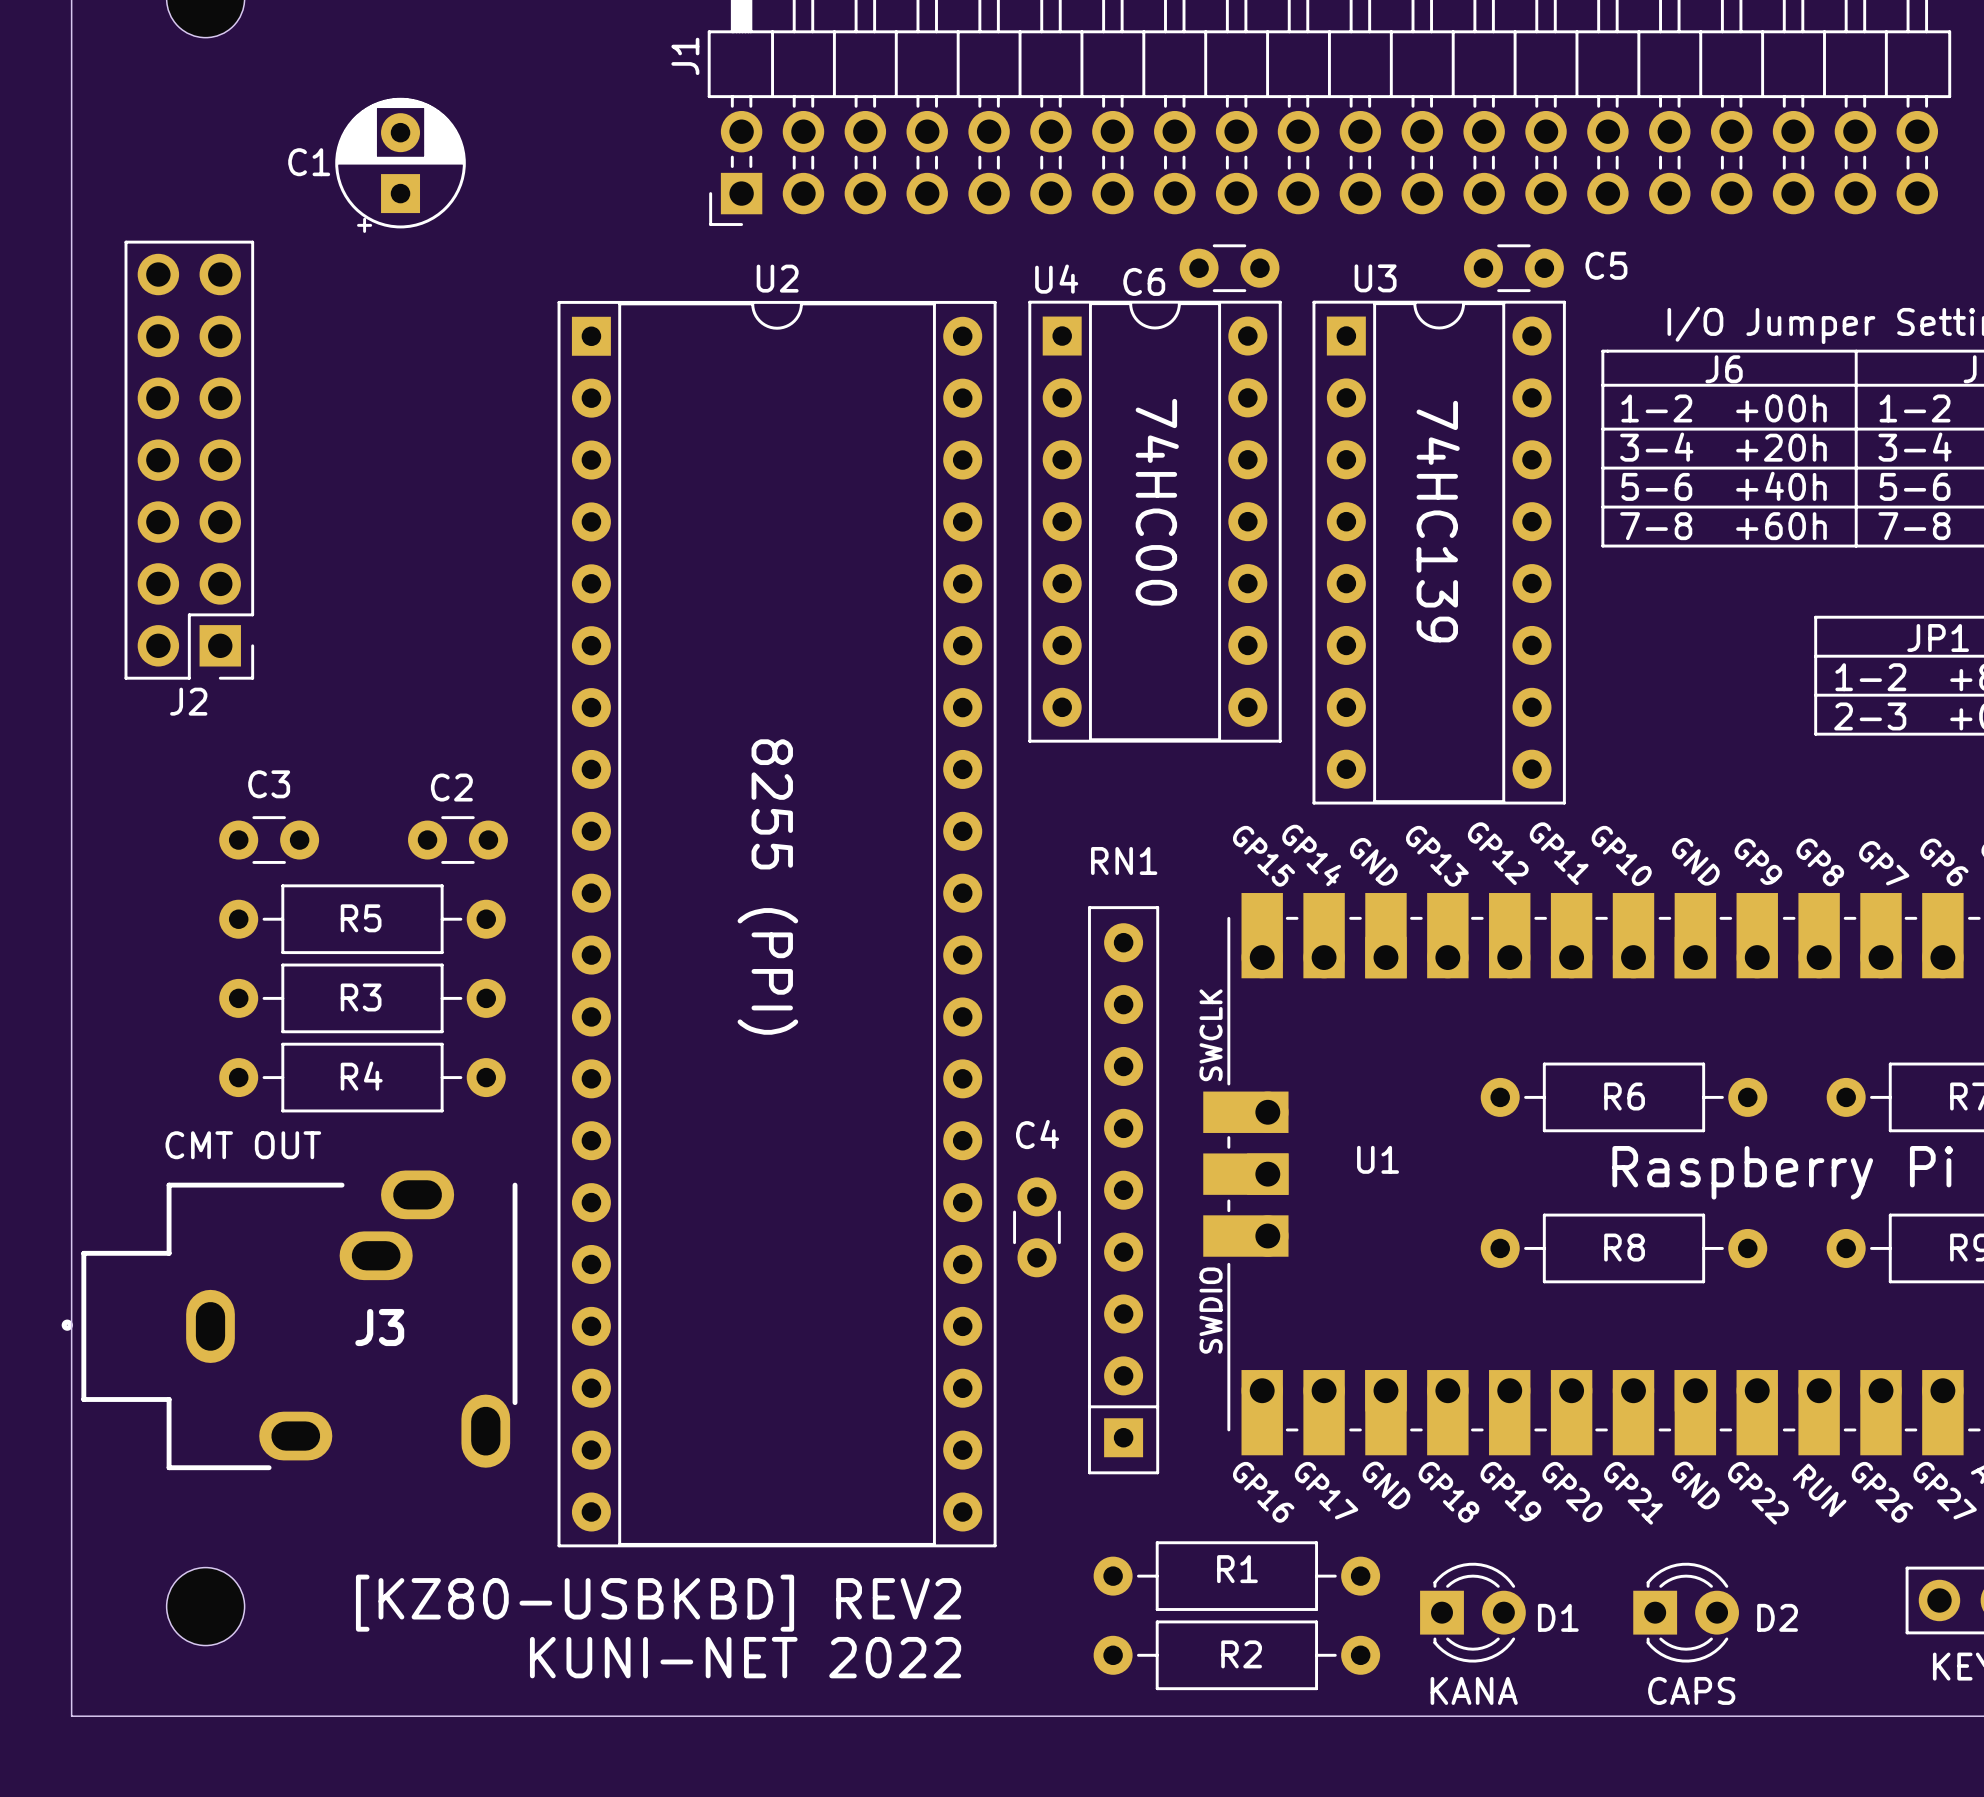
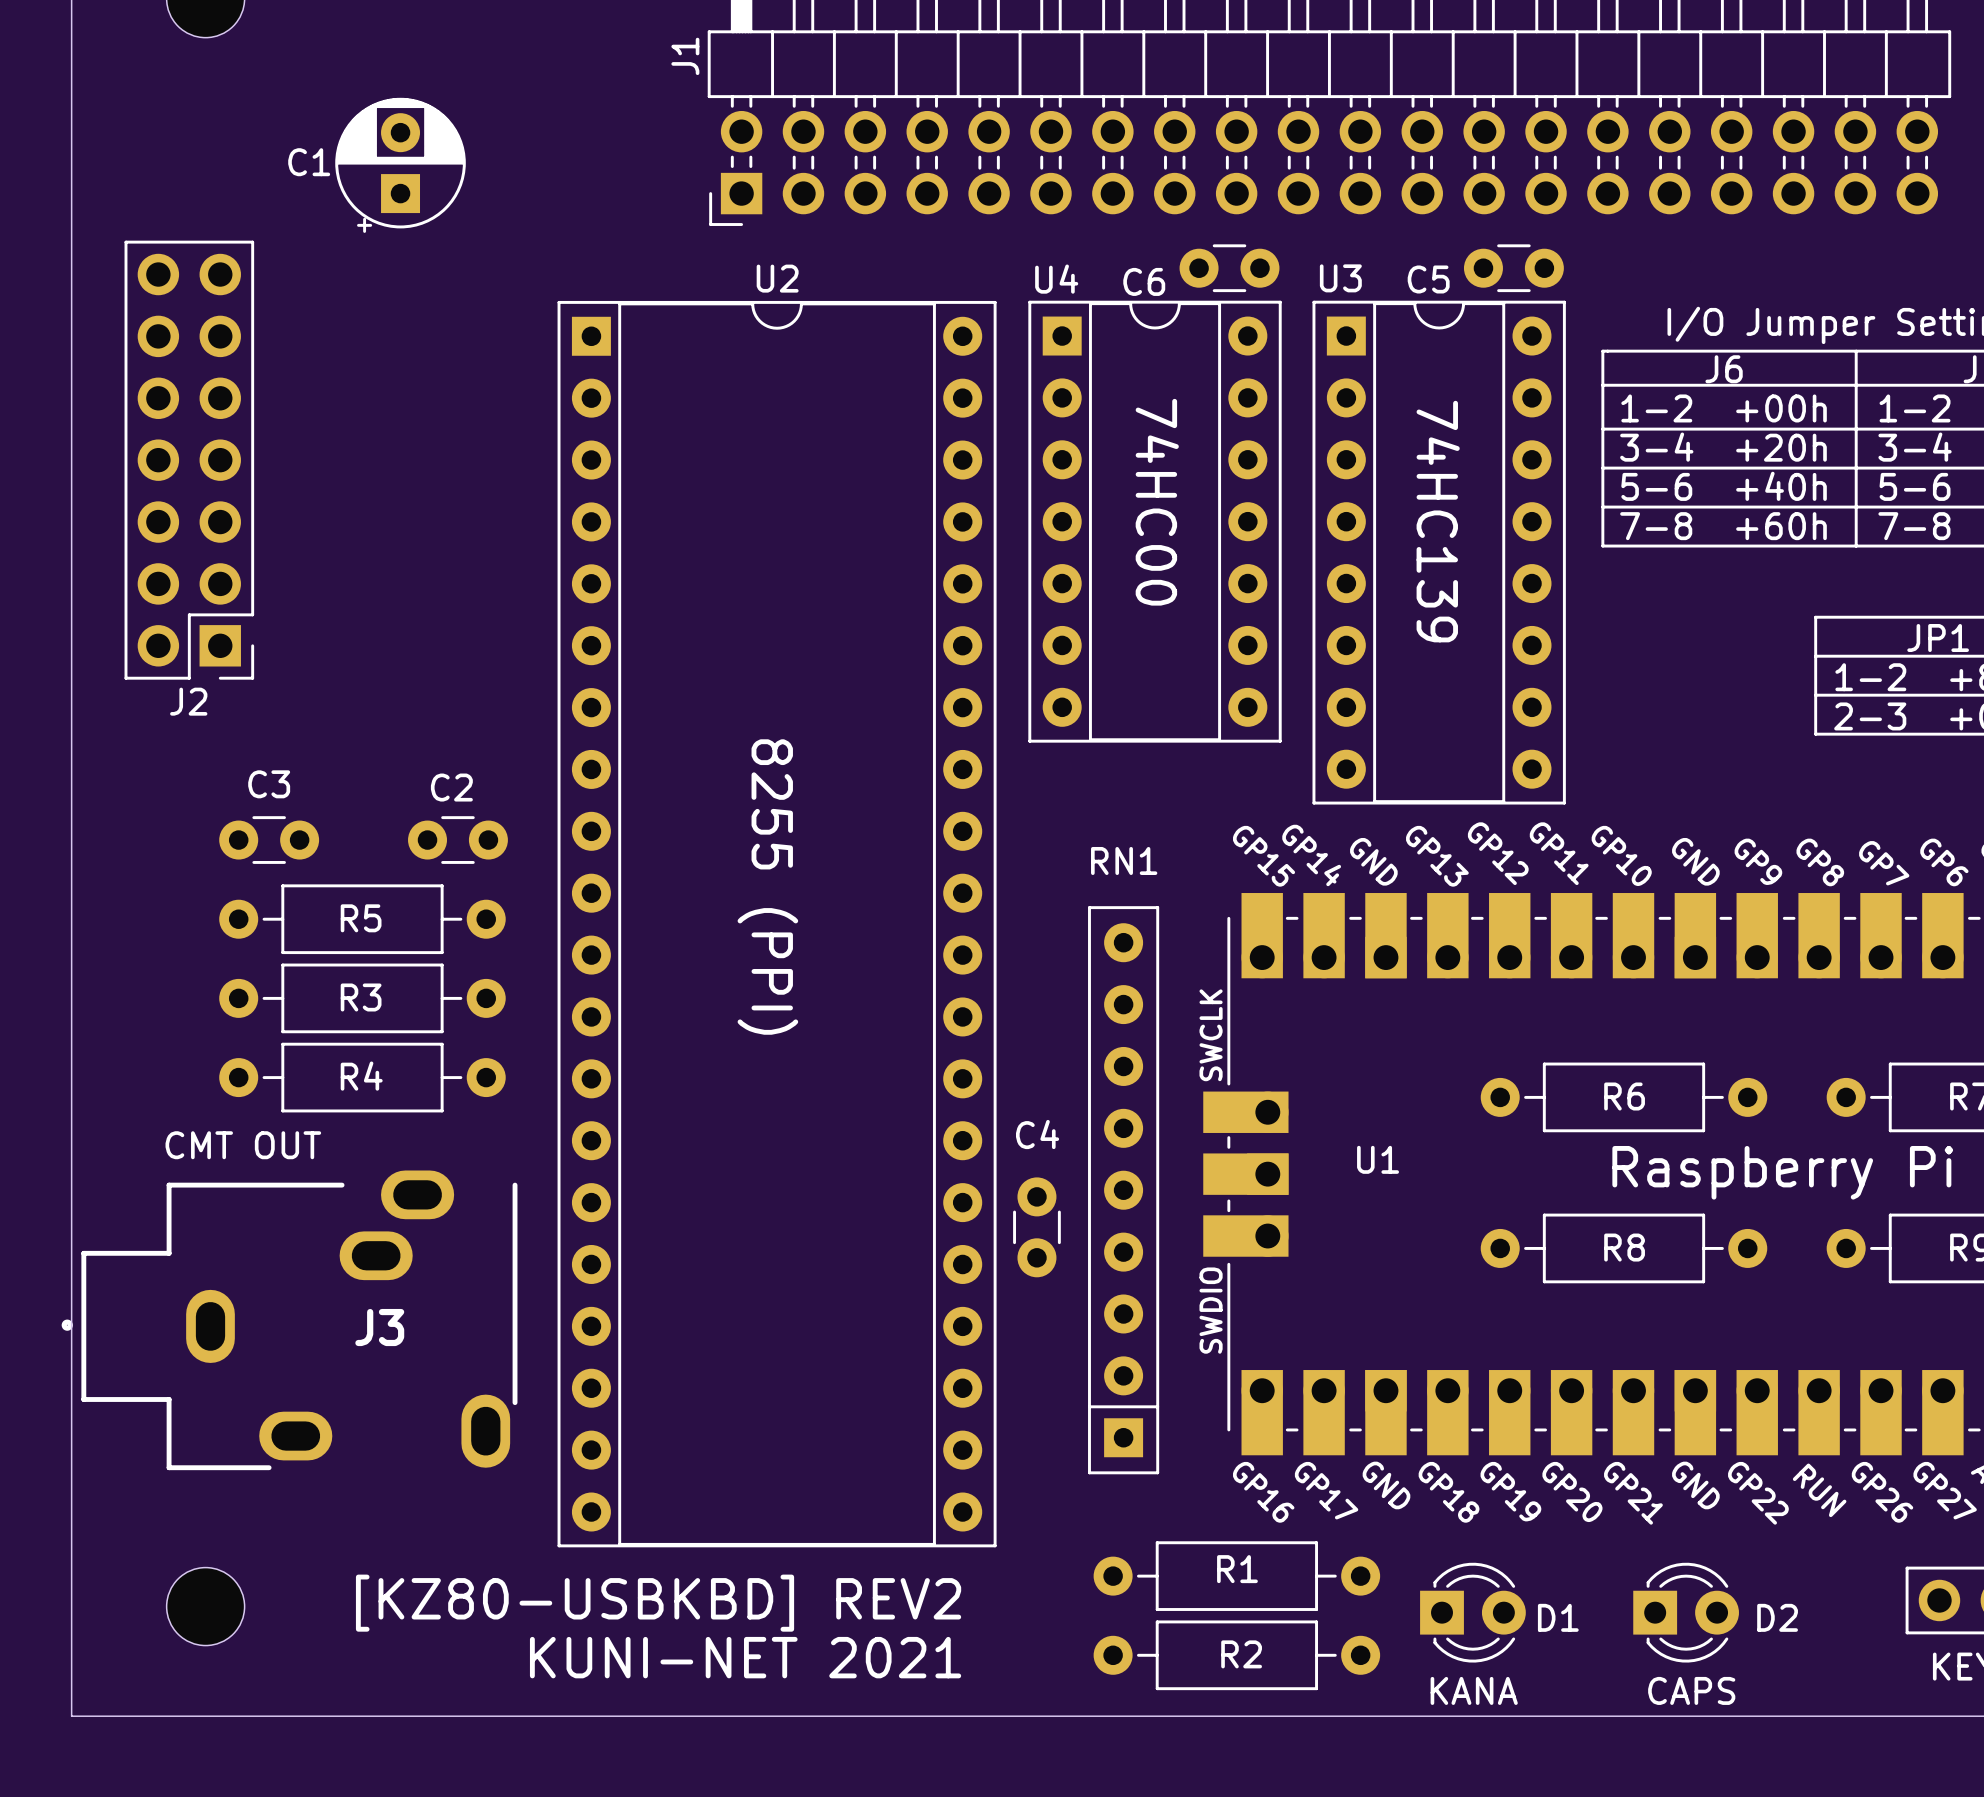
C5 name position: C5 (1606, 265) -> C5 (1428, 279)
U3 name position: U3 (1375, 278) -> U3 (1340, 278)
text: KUNI-NET 2022 (745, 1657) -> KUNI-NET 2021 (745, 1657)

